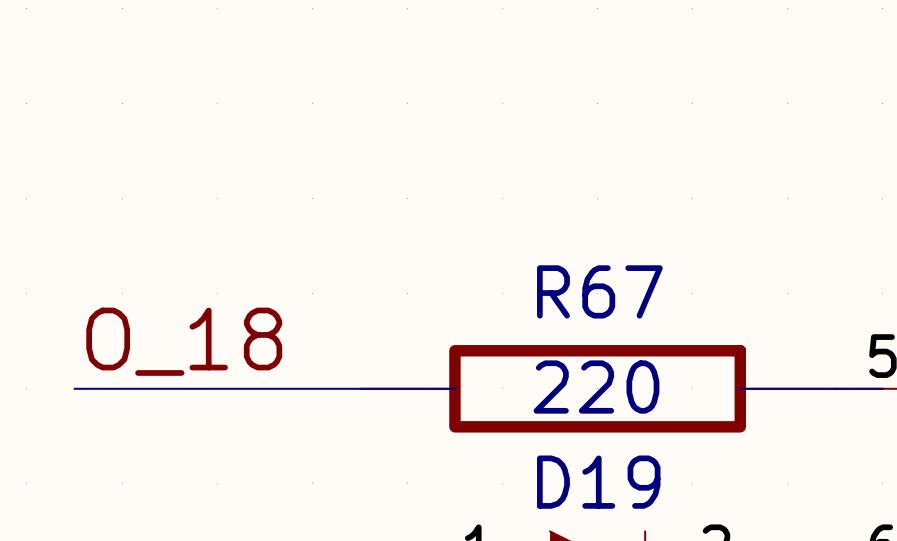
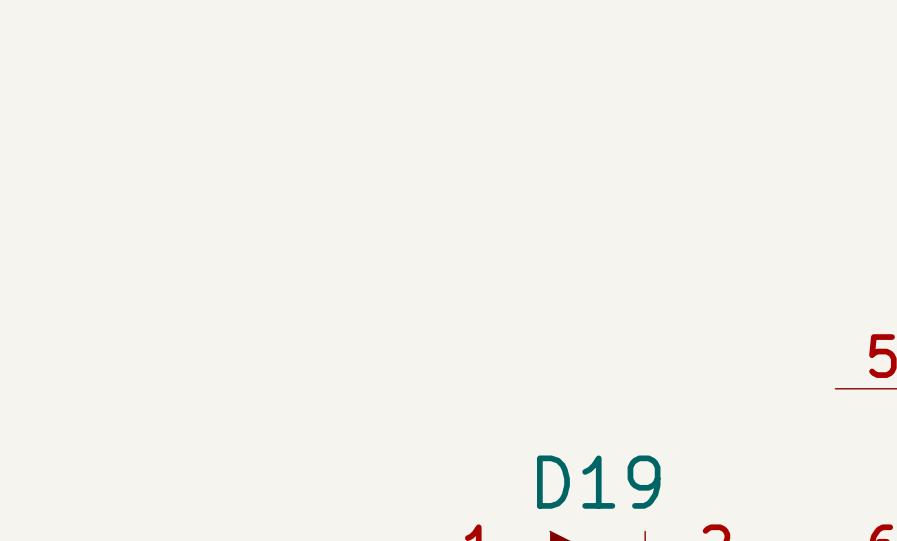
label: O_18 (184, 341) -> none
wire: (74, 388) (454, 388) -> none
R67: 220 (597, 388) -> none
wire: (740, 388) (882, 388) -> none

